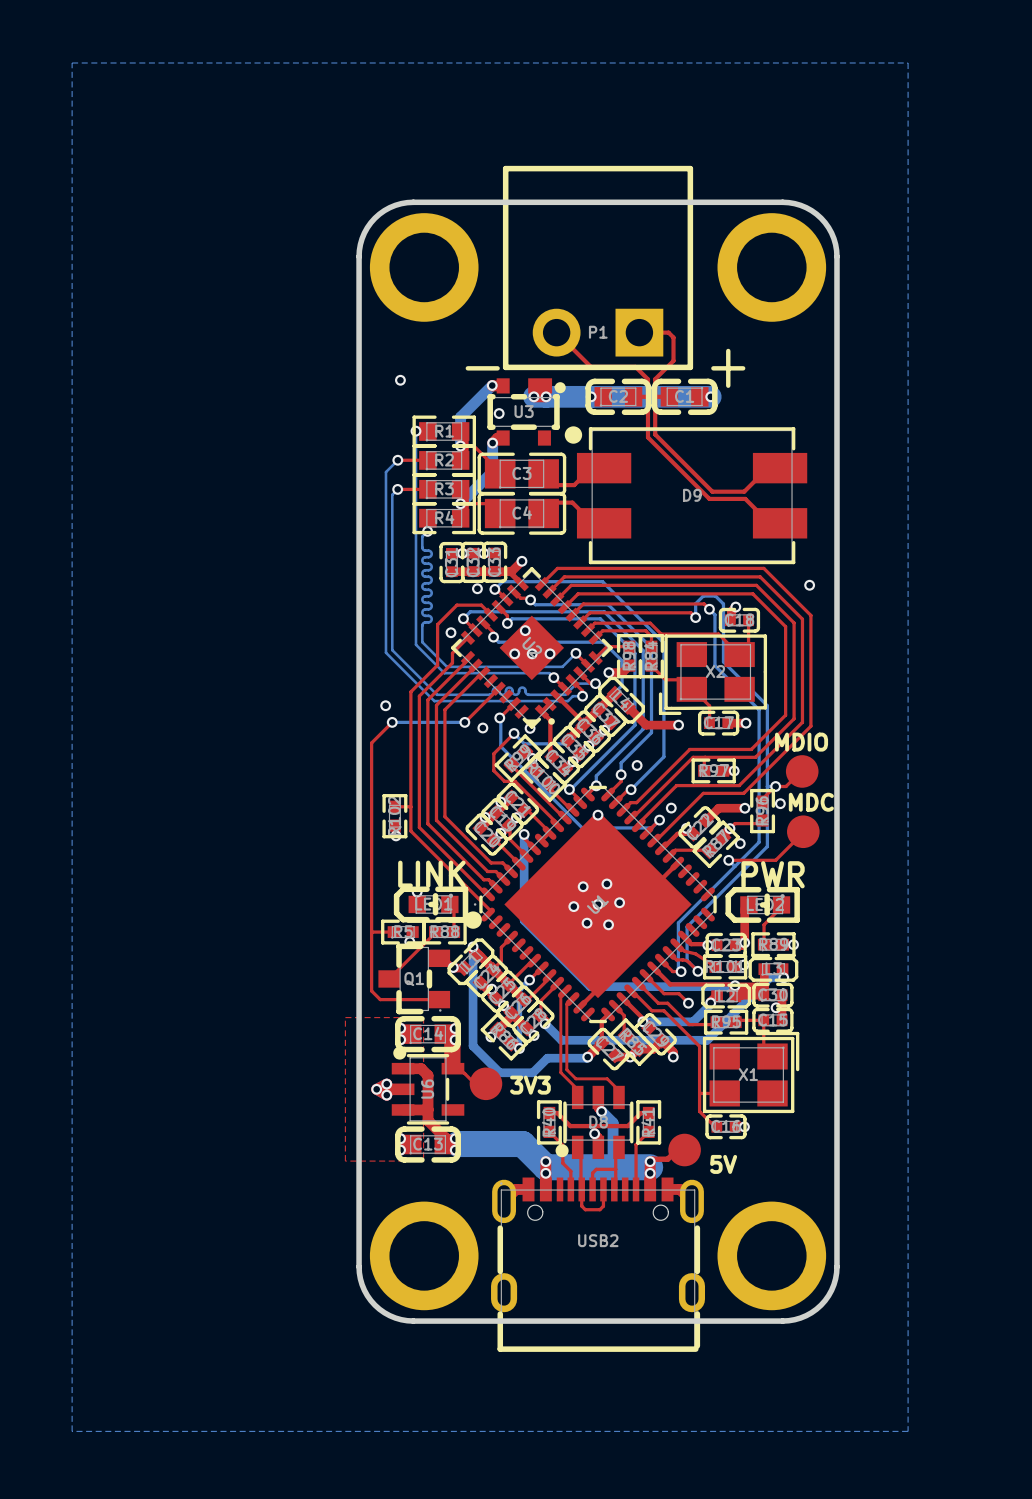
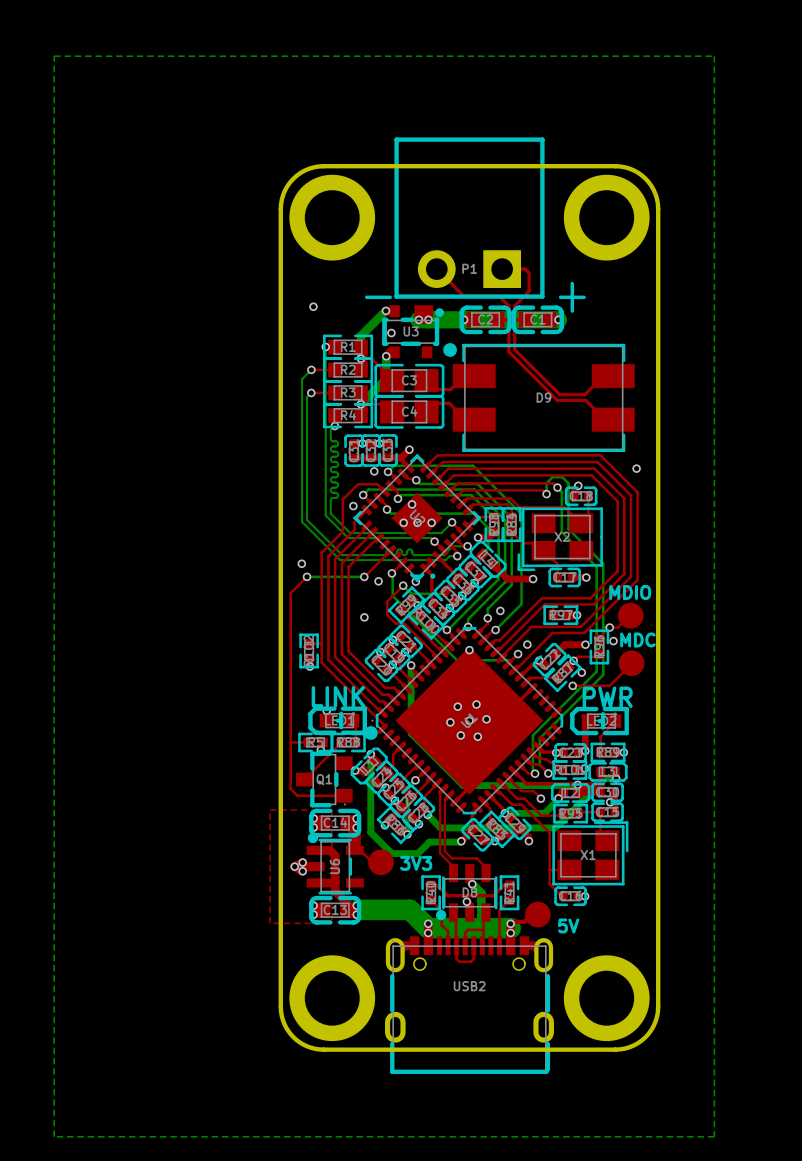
via: none -> (364, 617)

